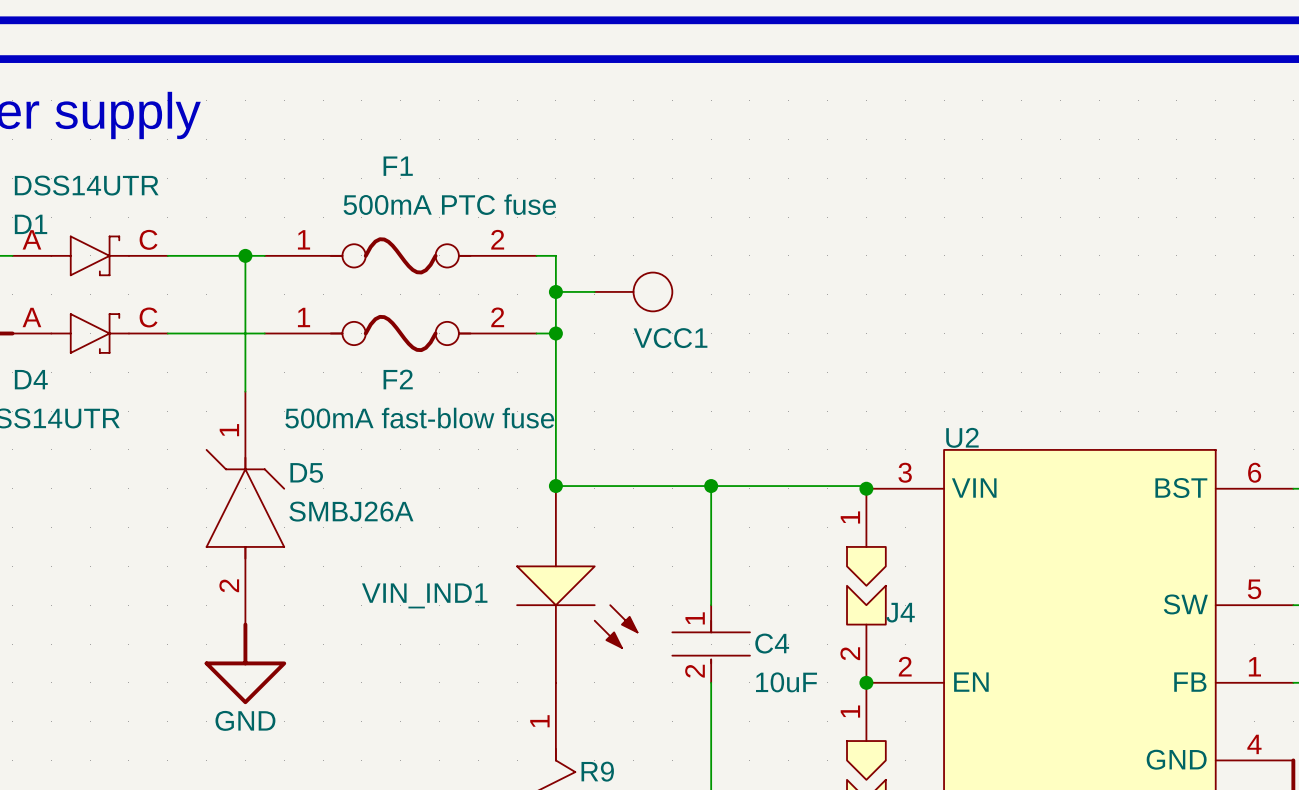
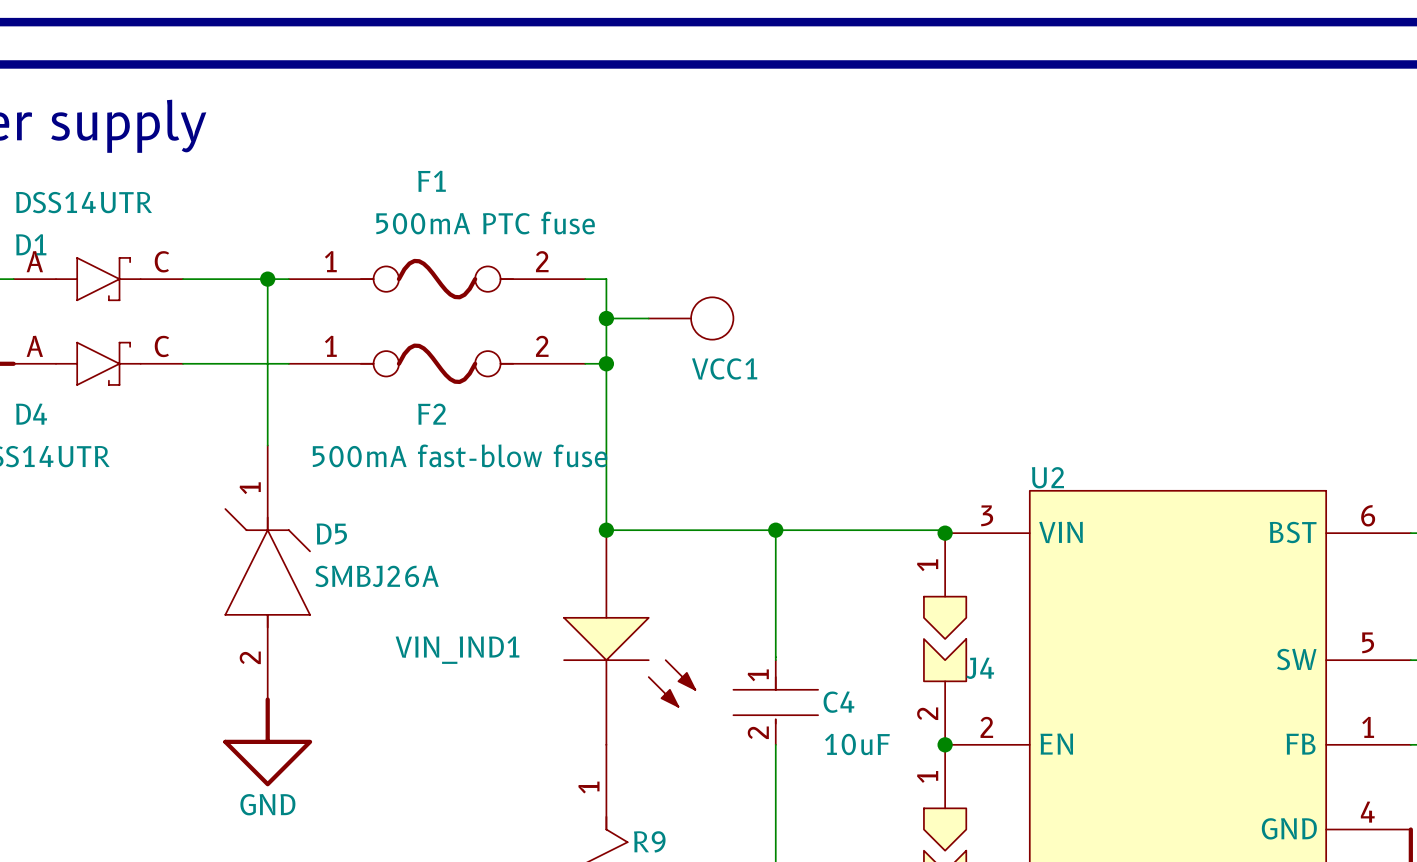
D5 position: (245, 508) -> (267, 572)
power symbol position: GND (245, 663) -> GND (267, 741)

